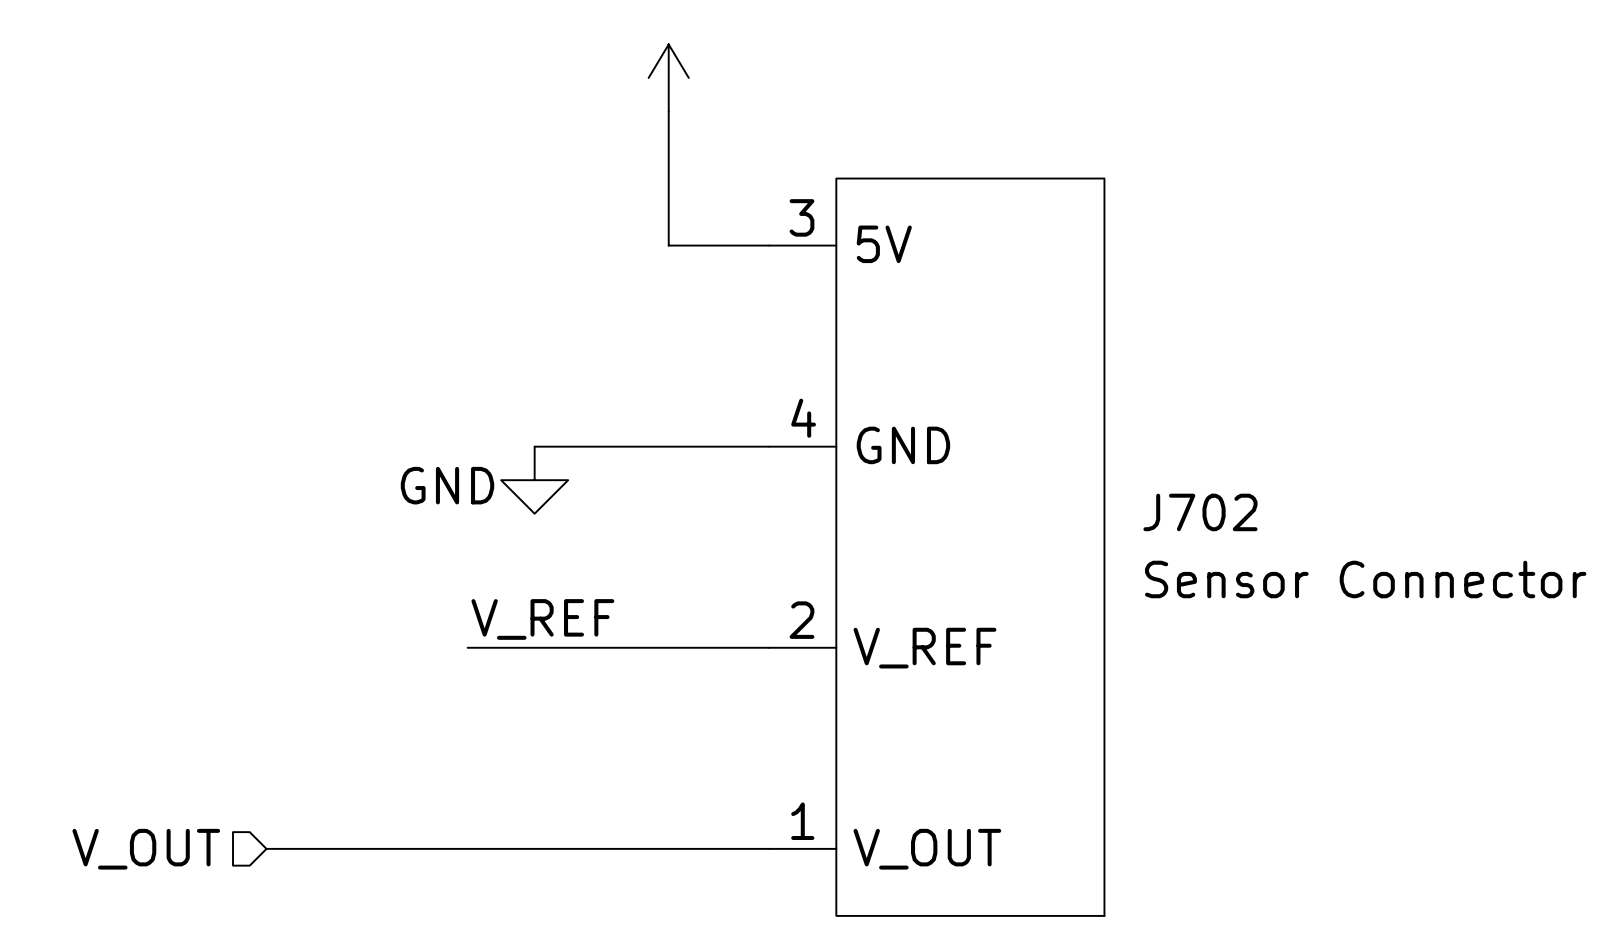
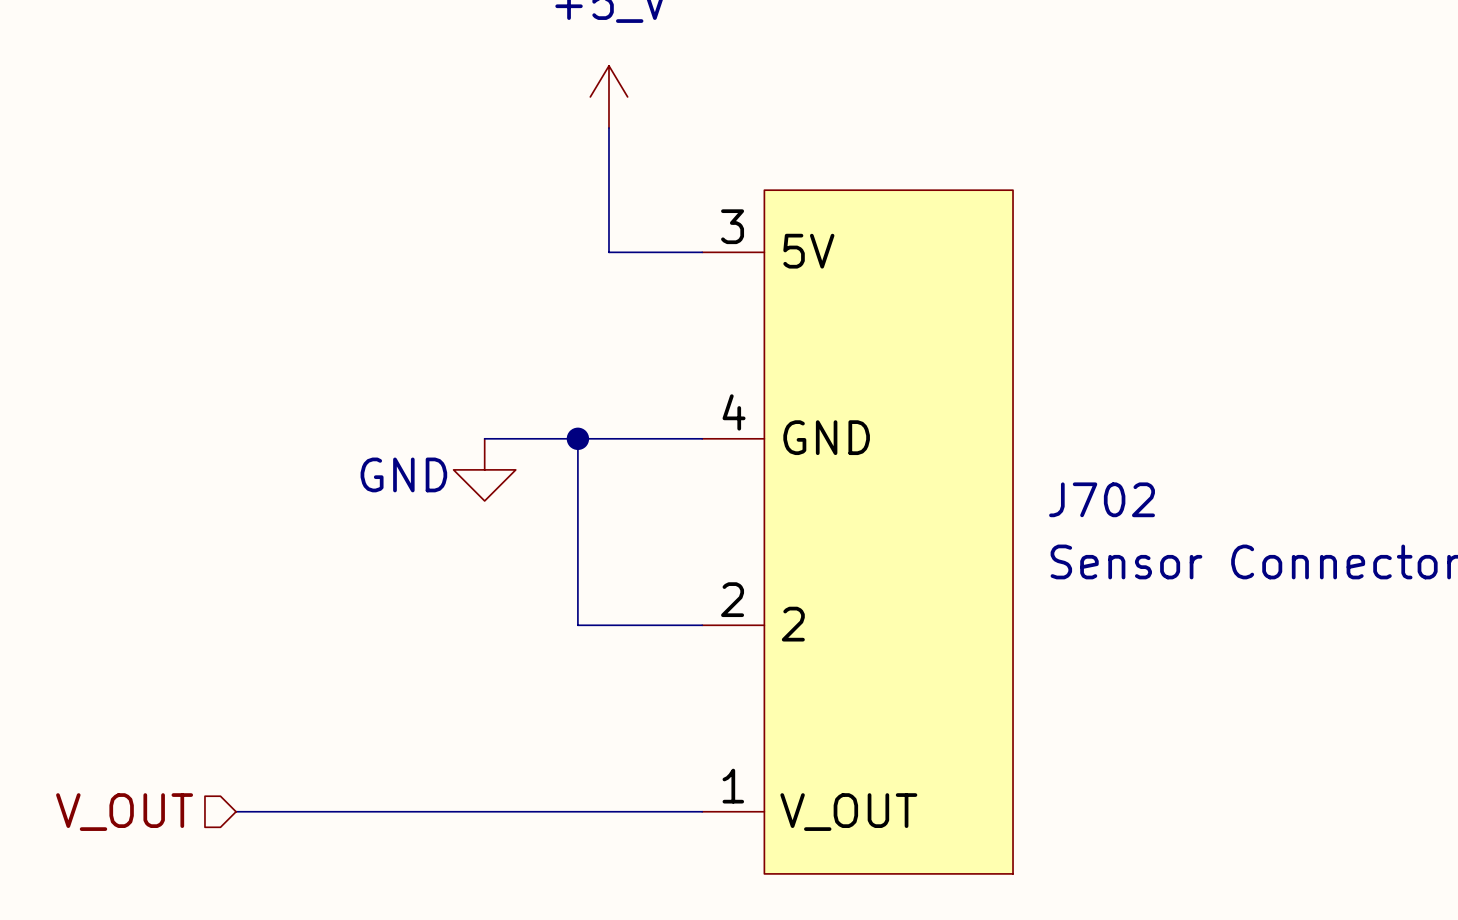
junction: none -> (577, 438)
label: V_REF (542, 619) -> none
wire: (467, 647) (635, 647) -> (577, 438) (577, 625)
J702 pin name: V_REF (924, 648) -> 2 (793, 624)

